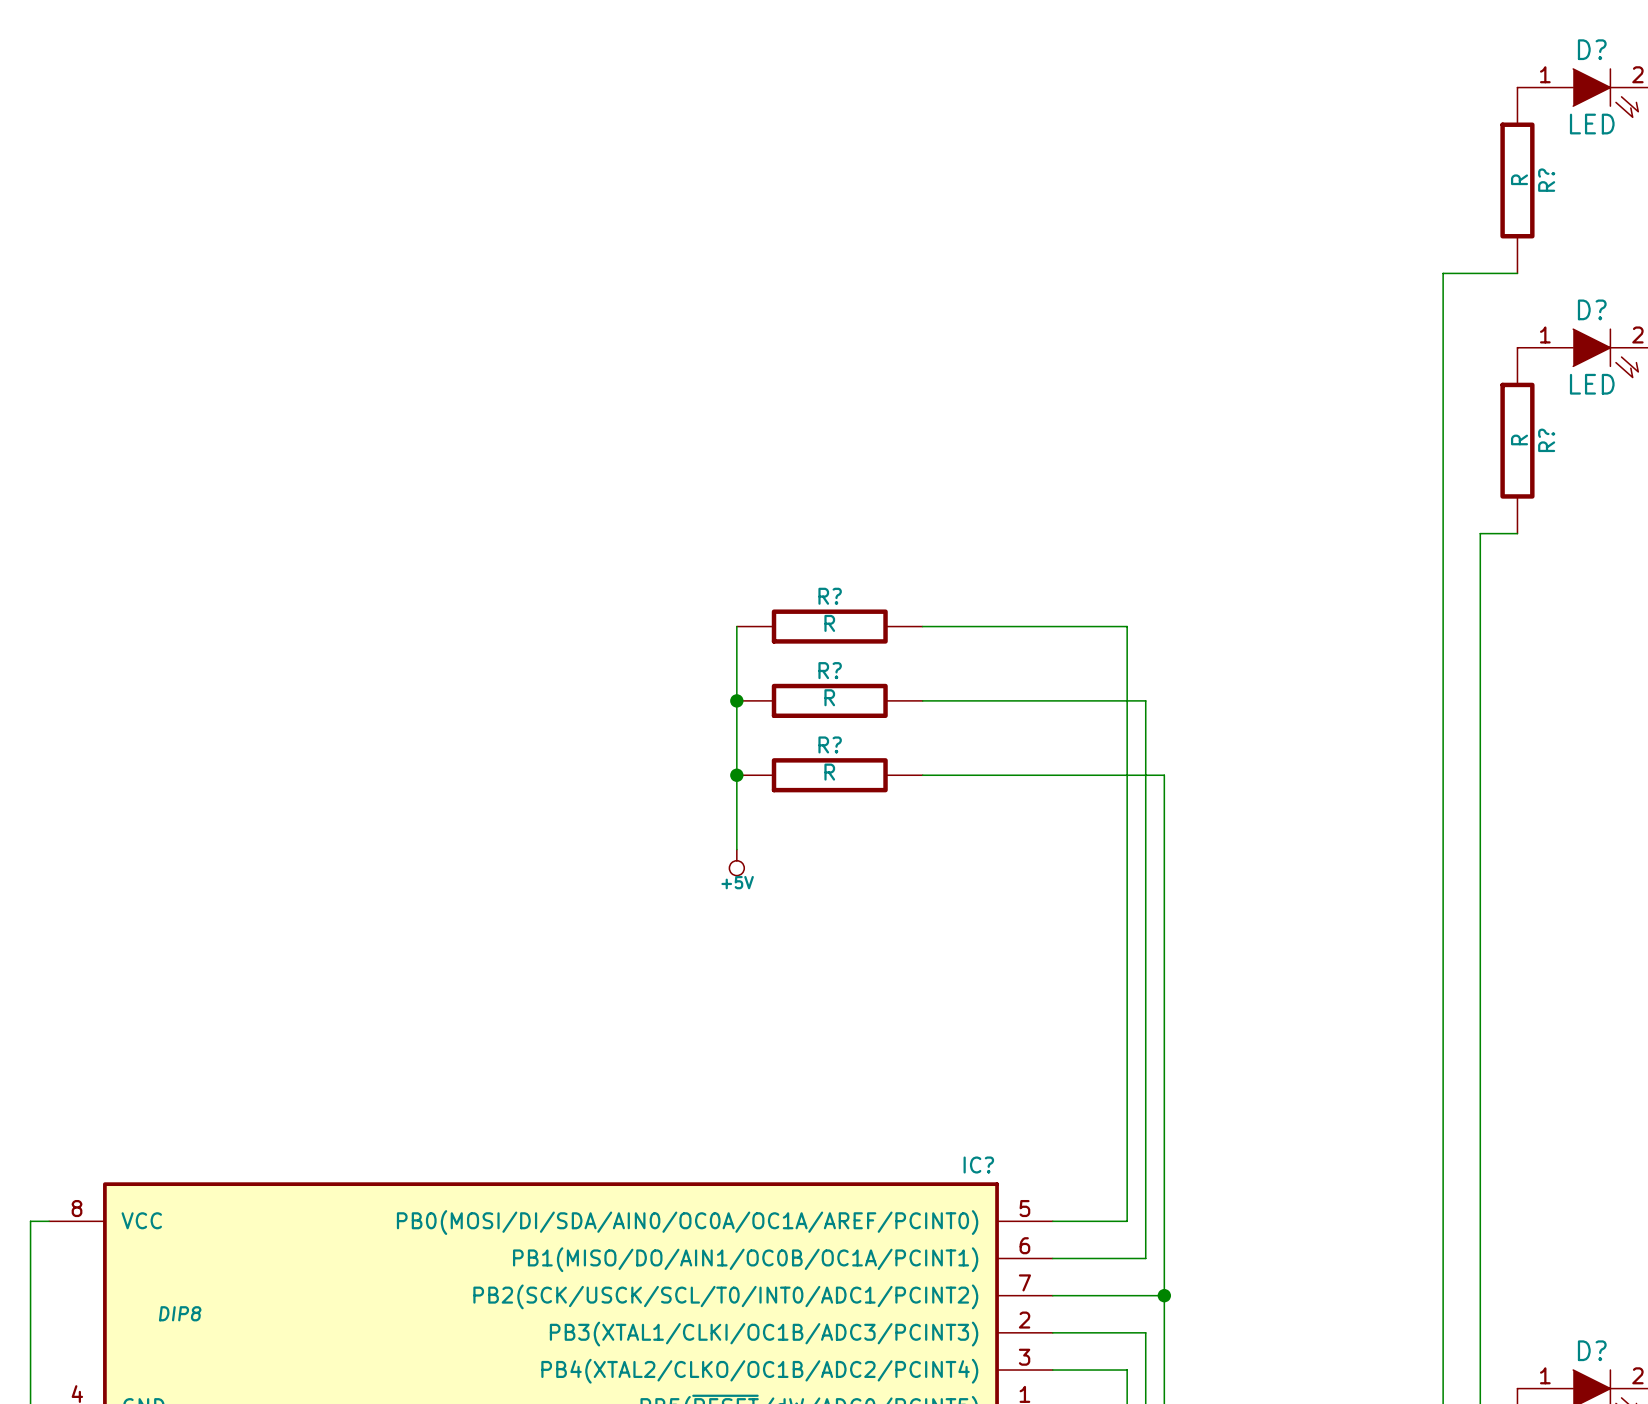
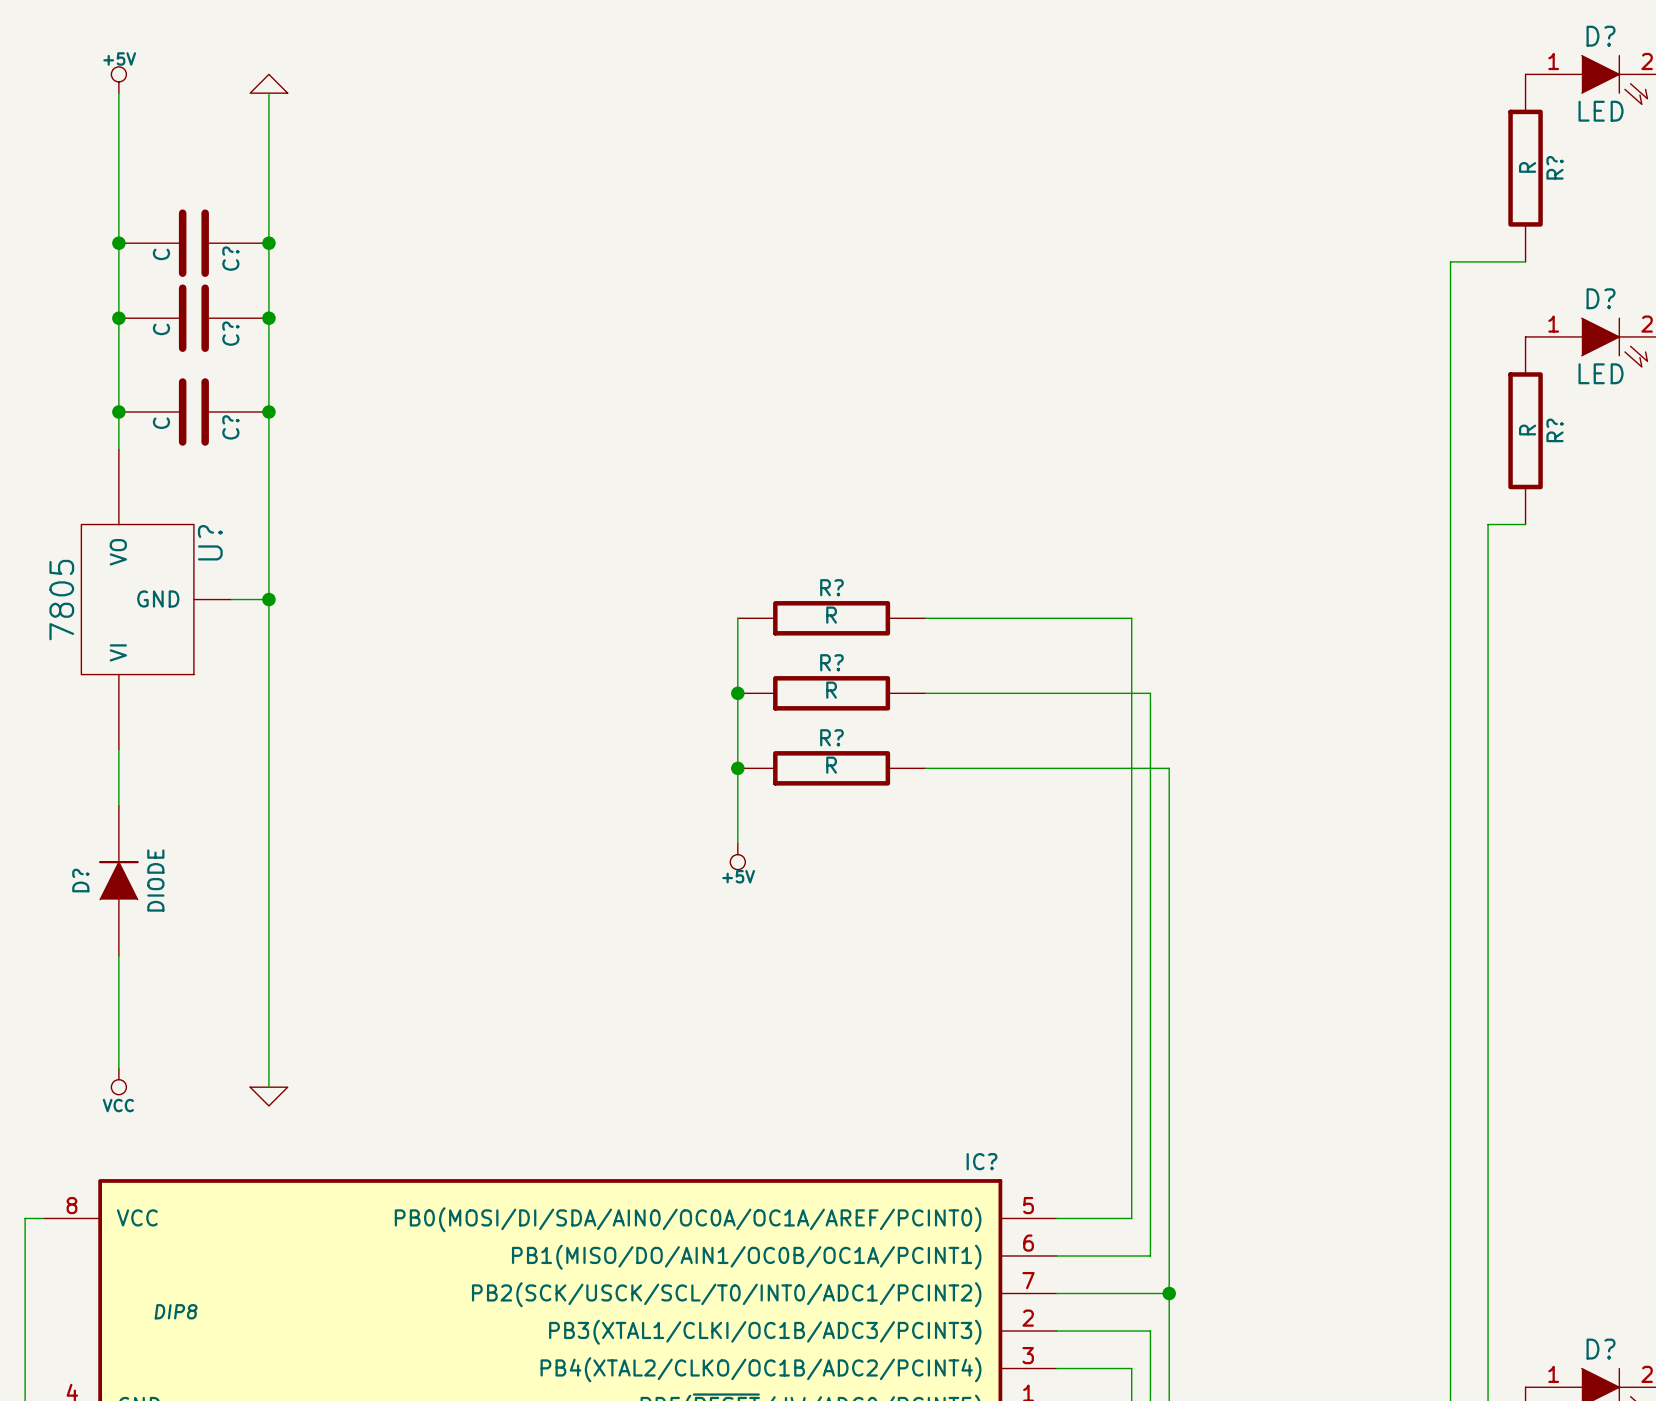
power symbol: none -> +5V (118, 80)
power symbol: none -> (268, 83)
wire: none -> (118, 93) (118, 449)
wire: none -> (268, 93) (268, 1087)
junction: none -> (118, 243)
C?: none -> C (193, 243)
junction: none -> (268, 243)
junction: none -> (118, 318)
C?: none -> C (193, 318)
junction: none -> (268, 318)
junction: none -> (118, 411)
C?: none -> C (193, 411)
junction: none -> (268, 411)
U?: none -> 7805 (156, 599)
wire: none -> (231, 599) (268, 599)
junction: none -> (268, 599)
wire: none -> (118, 749) (118, 805)
D?: none -> DIODE (118, 880)
wire: none -> (118, 955) (118, 1068)
power symbol: none -> VCC (118, 1081)
power symbol: none -> (268, 1096)

